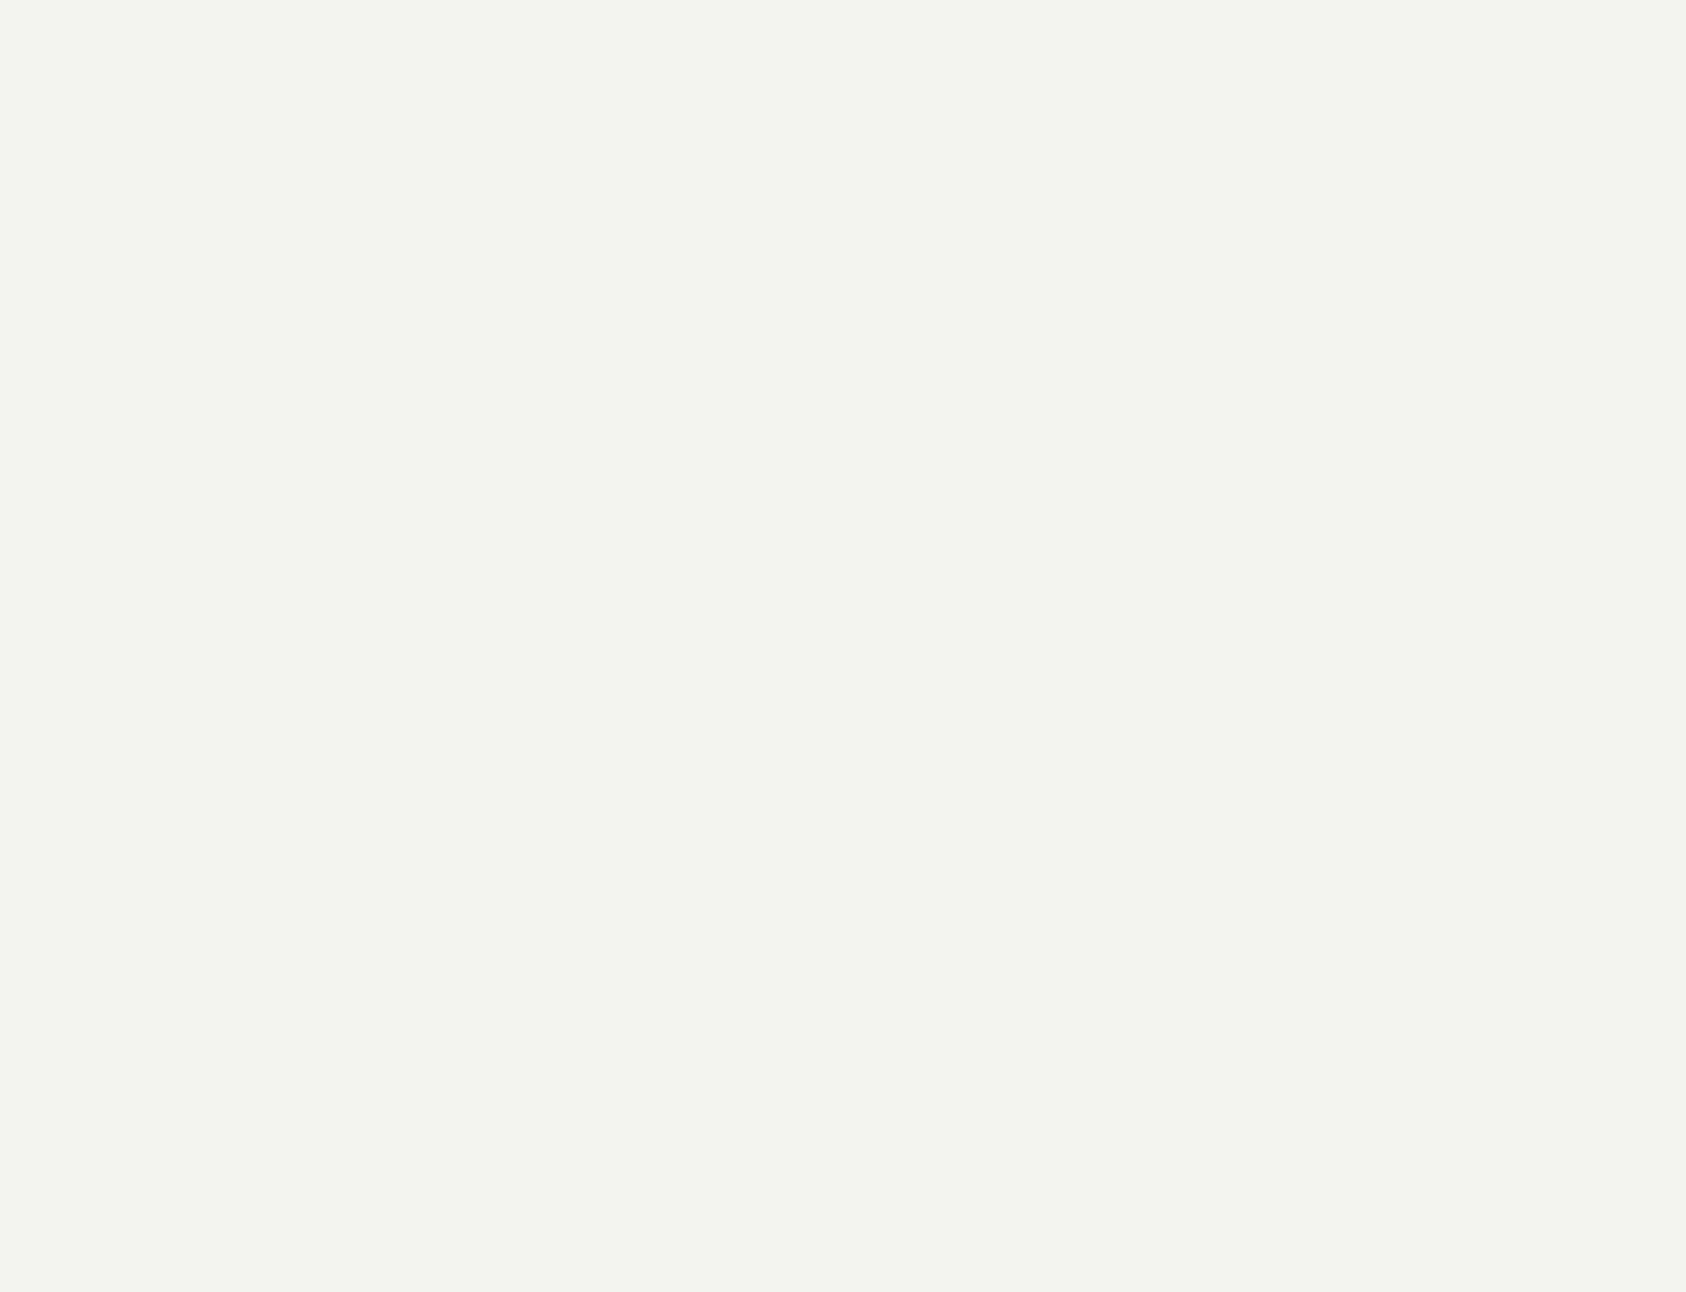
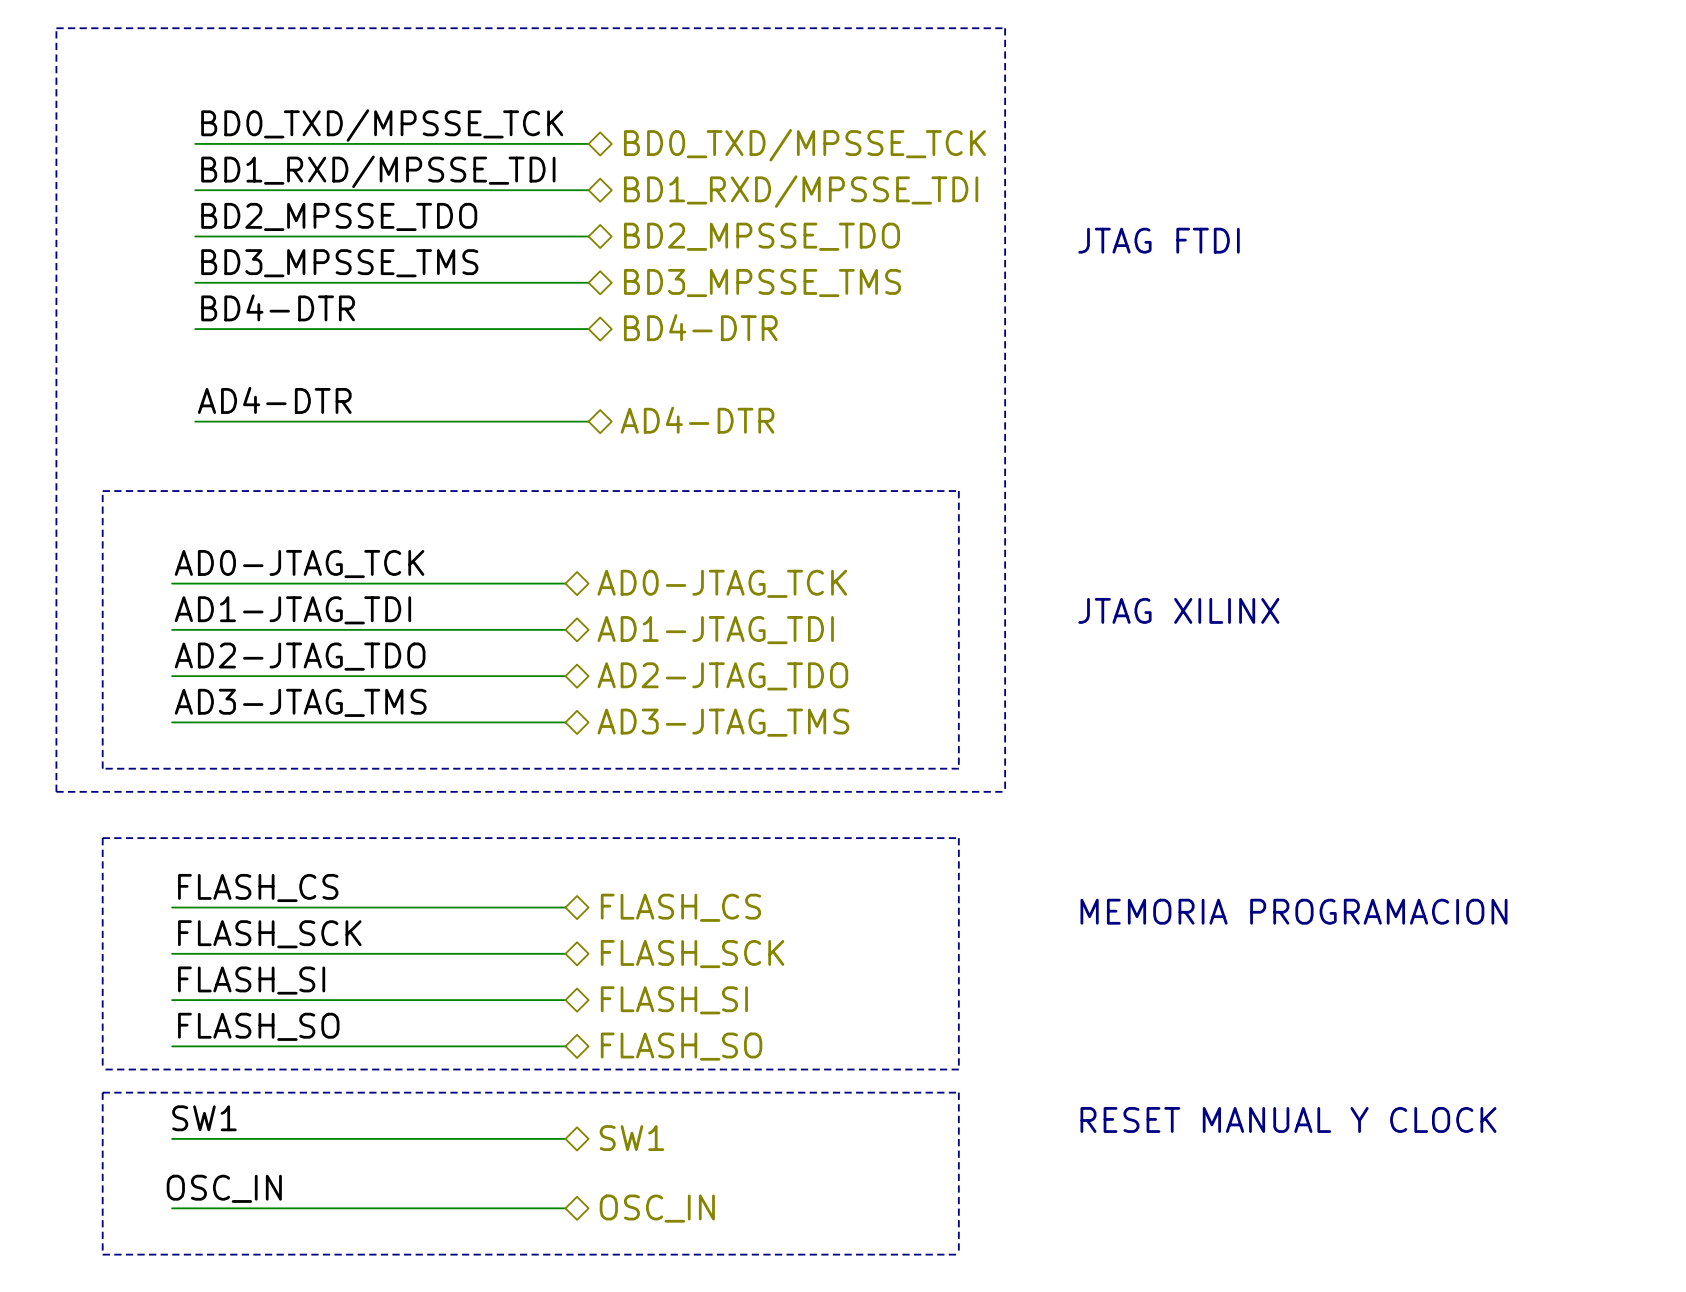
line: none -> (56, 28) (1005, 28) (1005, 791) (56, 791) (56, 28)
label: none -> BD0_TXD/MPSSE_TCK (382, 125)
wire: none -> (195, 143) (588, 143)
hierarchical label: none -> BD0_TXD/MPSSE_TCK (804, 145)
label: none -> BD1_RXD/MPSSE_TDI (378, 171)
hierarchical label: none -> BD1_RXD/MPSSE_TDI (801, 191)
wire: none -> (195, 190) (588, 190)
label: none -> BD2_MPSSE_TDO (339, 216)
hierarchical label: none -> BD2_MPSSE_TDO (761, 236)
wire: none -> (195, 236) (588, 236)
text: none -> JTAG FTDI (1159, 240)
label: none -> BD3_MPSSE_TMS (339, 263)
hierarchical label: none -> BD3_MPSSE_TMS (762, 283)
wire: none -> (195, 282) (588, 282)
label: none -> BD4-DTR (278, 307)
hierarchical label: none -> BD4-DTR (700, 327)
wire: none -> (195, 329) (588, 329)
label: none -> AD4-DTR (274, 400)
hierarchical label: none -> AD4-DTR (697, 420)
wire: none -> (195, 421) (588, 421)
line: none -> (102, 491) (958, 491) (958, 768) (102, 768) (102, 491)
label: none -> AD0-JTAG_TCK (299, 564)
hierarchical label: none -> AD0-JTAG_TCK (722, 583)
wire: none -> (172, 583) (565, 583)
label: none -> AD1-JTAG_TDI (292, 610)
text: none -> JTAG XILINX (1178, 610)
wire: none -> (172, 629) (565, 629)
hierarchical label: none -> AD1-JTAG_TDI (715, 630)
label: none -> AD2-JTAG_TDO (300, 656)
hierarchical label: none -> AD2-JTAG_TDO (722, 676)
wire: none -> (172, 676) (565, 676)
label: none -> AD3-JTAG_TMS (300, 702)
hierarchical label: none -> AD3-JTAG_TMS (723, 722)
wire: none -> (172, 722) (565, 722)
line: none -> (102, 838) (102, 1069) (958, 1069) (958, 838) (102, 838)
label: none -> FLASH_CS (258, 887)
hierarchical label: none -> FLASH_CS (680, 907)
wire: none -> (172, 907) (565, 907)
text: none -> MEMORIA PROGRAMACION (1293, 911)
label: none -> FLASH_SCK (269, 934)
hierarchical label: none -> FLASH_SCK (692, 954)
wire: none -> (172, 953) (565, 953)
label: none -> FLASH_SI (251, 980)
hierarchical label: none -> FLASH_SI (674, 1000)
wire: none -> (172, 1000) (565, 1000)
label: none -> FLASH_SO (258, 1026)
hierarchical label: none -> FLASH_SO (681, 1046)
wire: none -> (172, 1046) (565, 1046)
line: none -> (102, 1092) (102, 1254) (958, 1254) (958, 1092) (102, 1092)
label: none -> SW1 (204, 1118)
text: none -> RESET MANUAL Y CLOCK (1288, 1119)
wire: none -> (172, 1138) (565, 1138)
hierarchical label: none -> SW1 (631, 1138)
label: none -> OSC_IN (224, 1188)
hierarchical label: none -> OSC_IN (657, 1208)
wire: none -> (172, 1208) (565, 1208)

